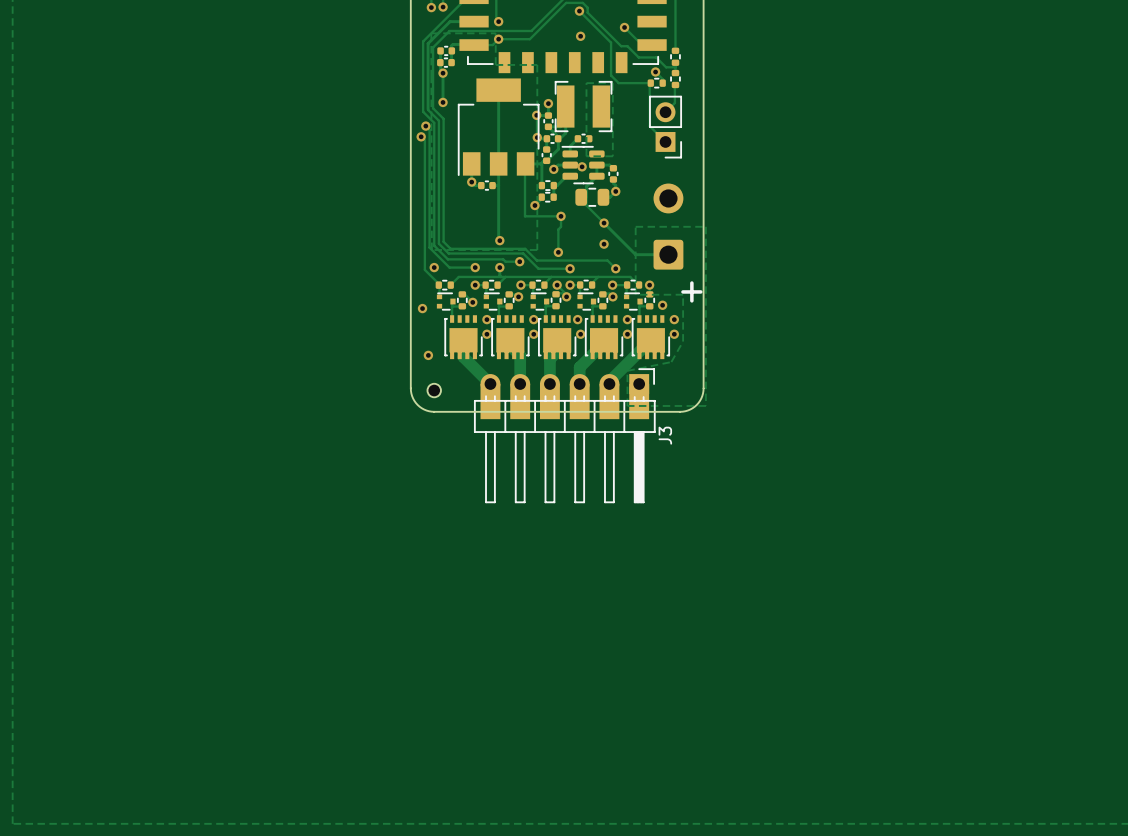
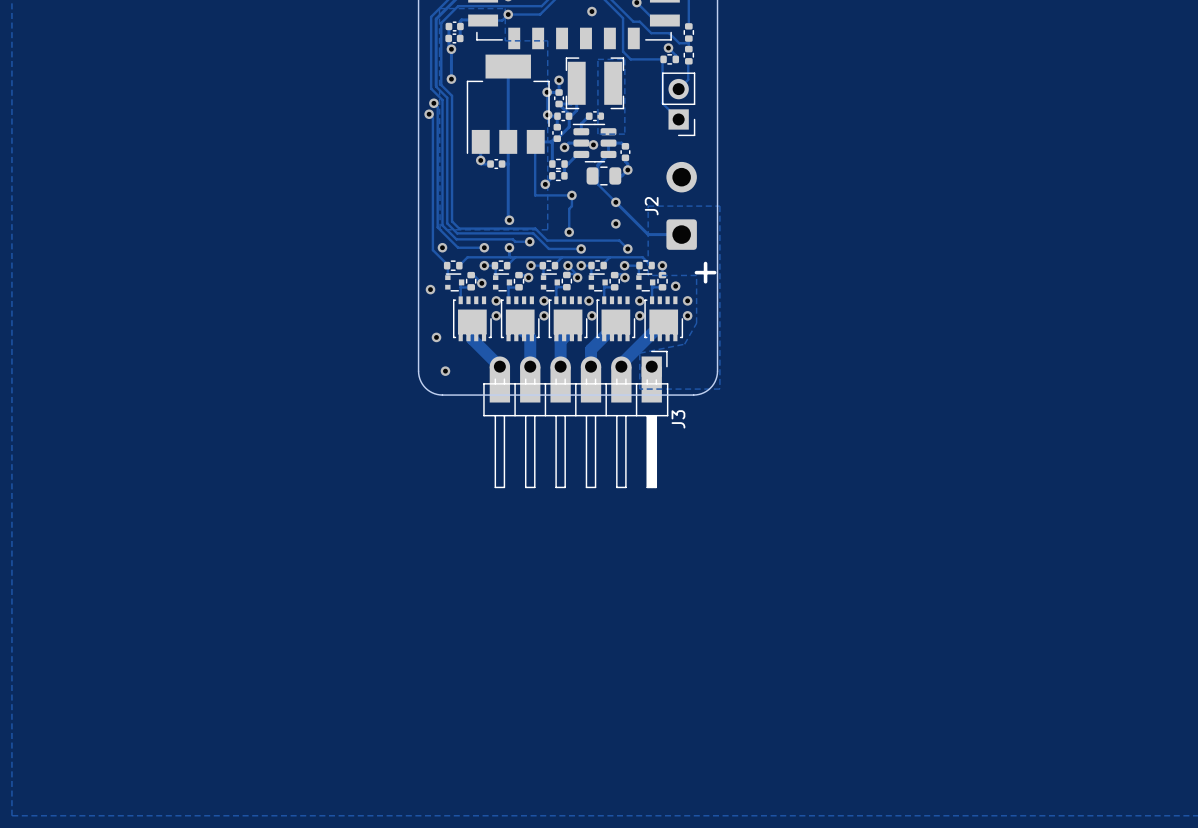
J2 name: none -> J2 (651, 206)
via: none -> (445, 371)
part: (434, 390) -> none

